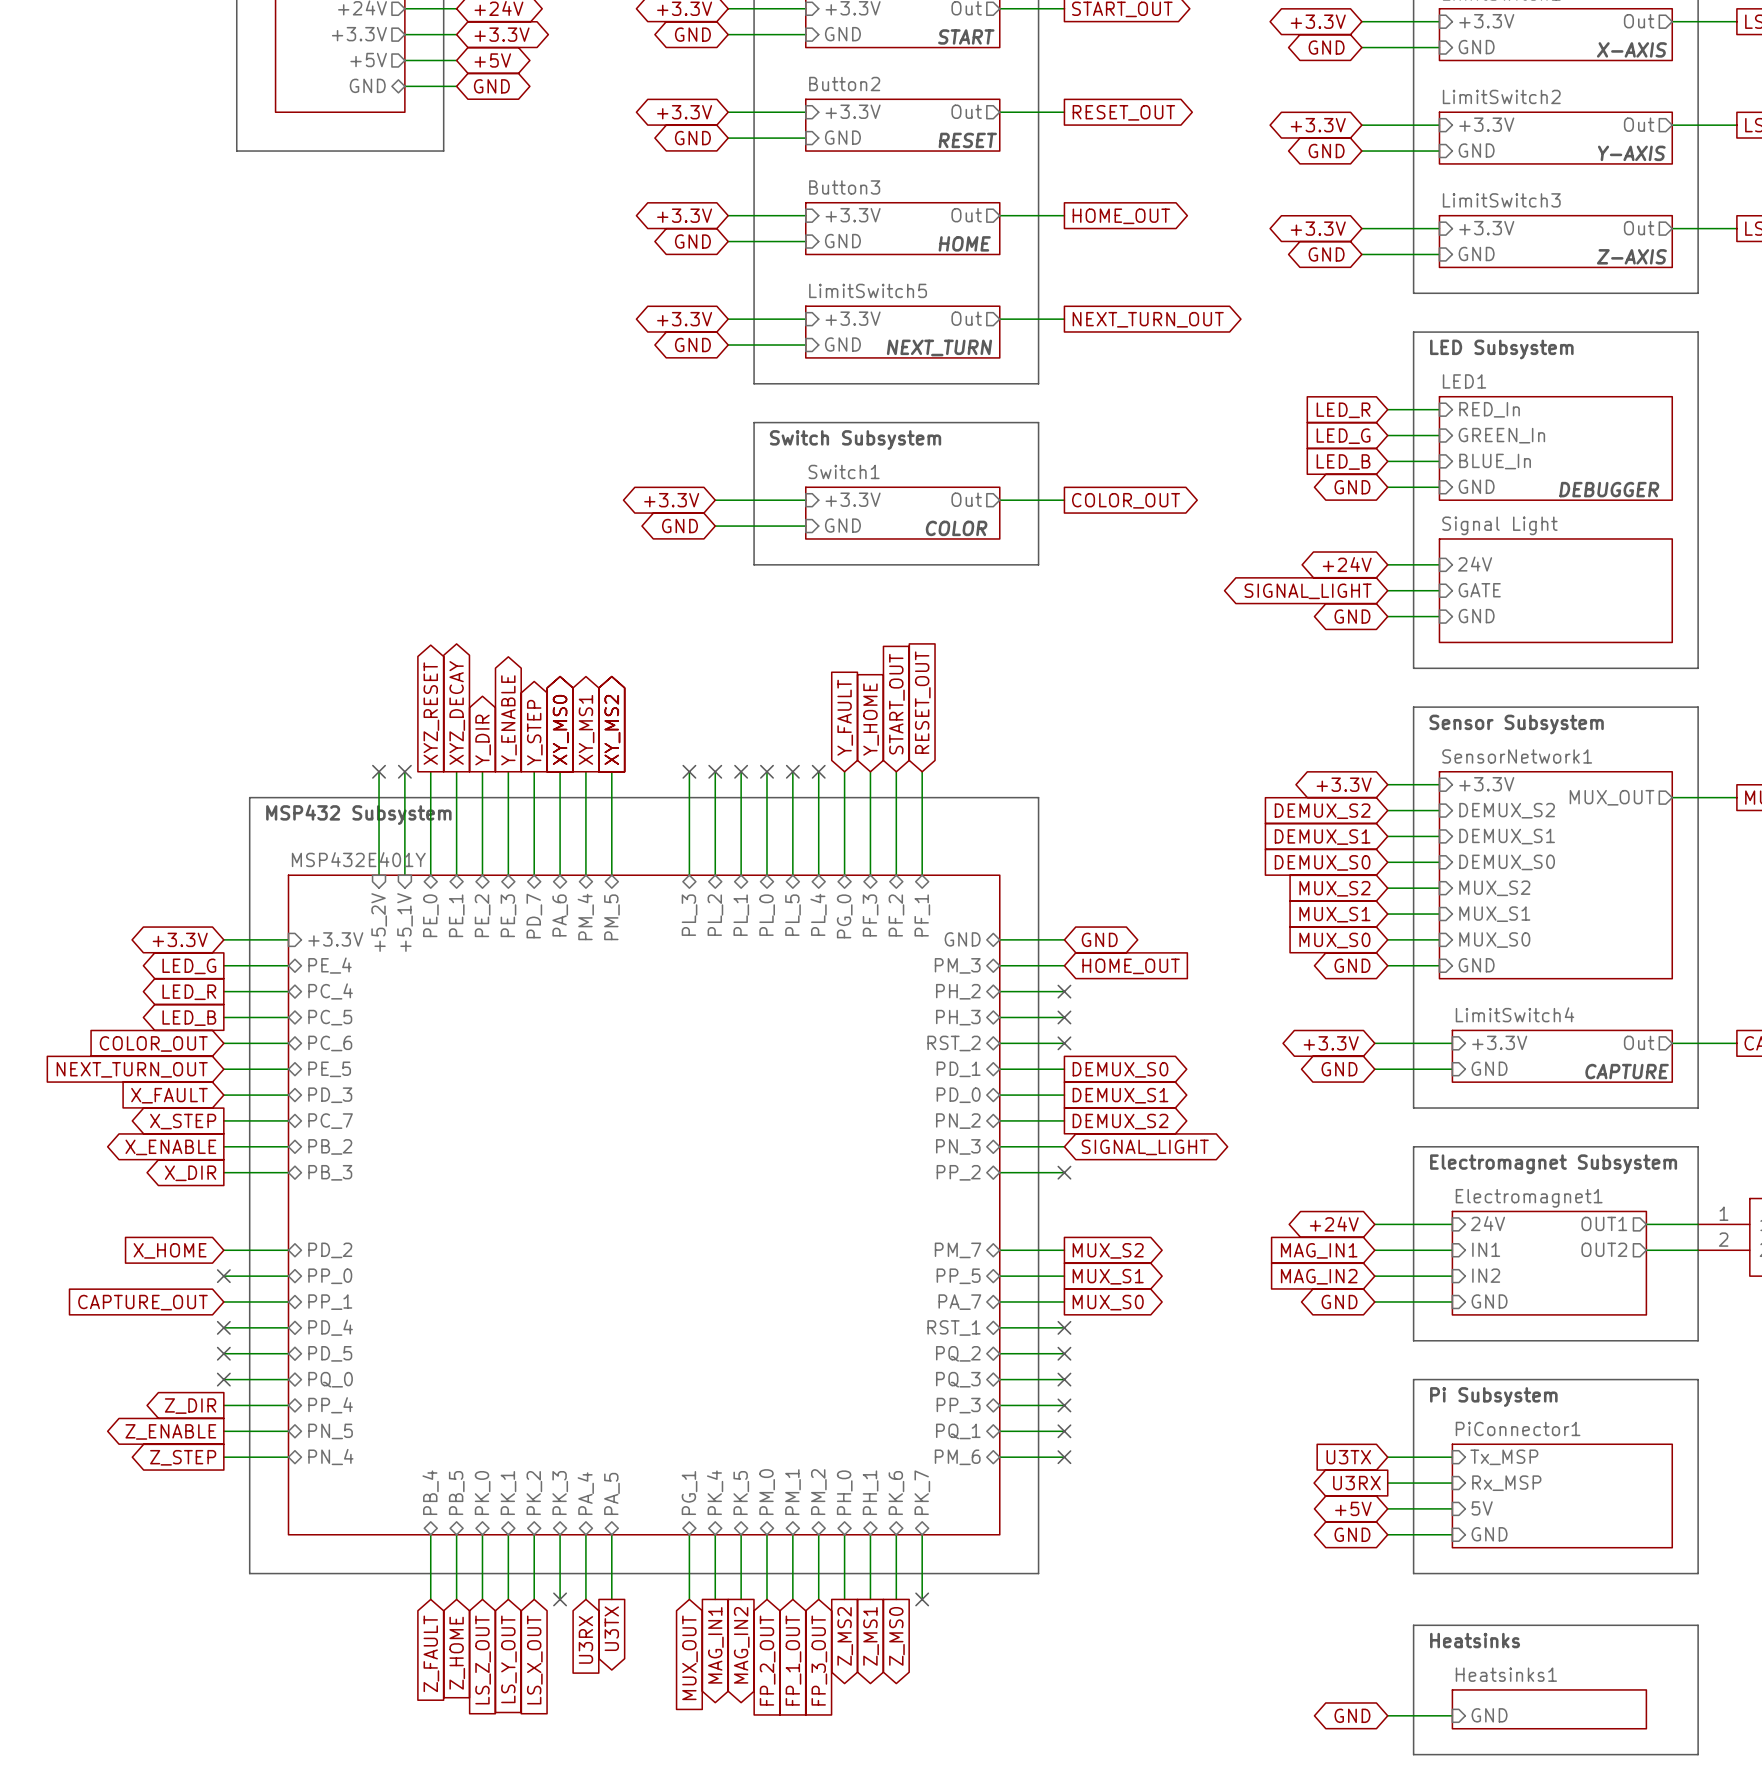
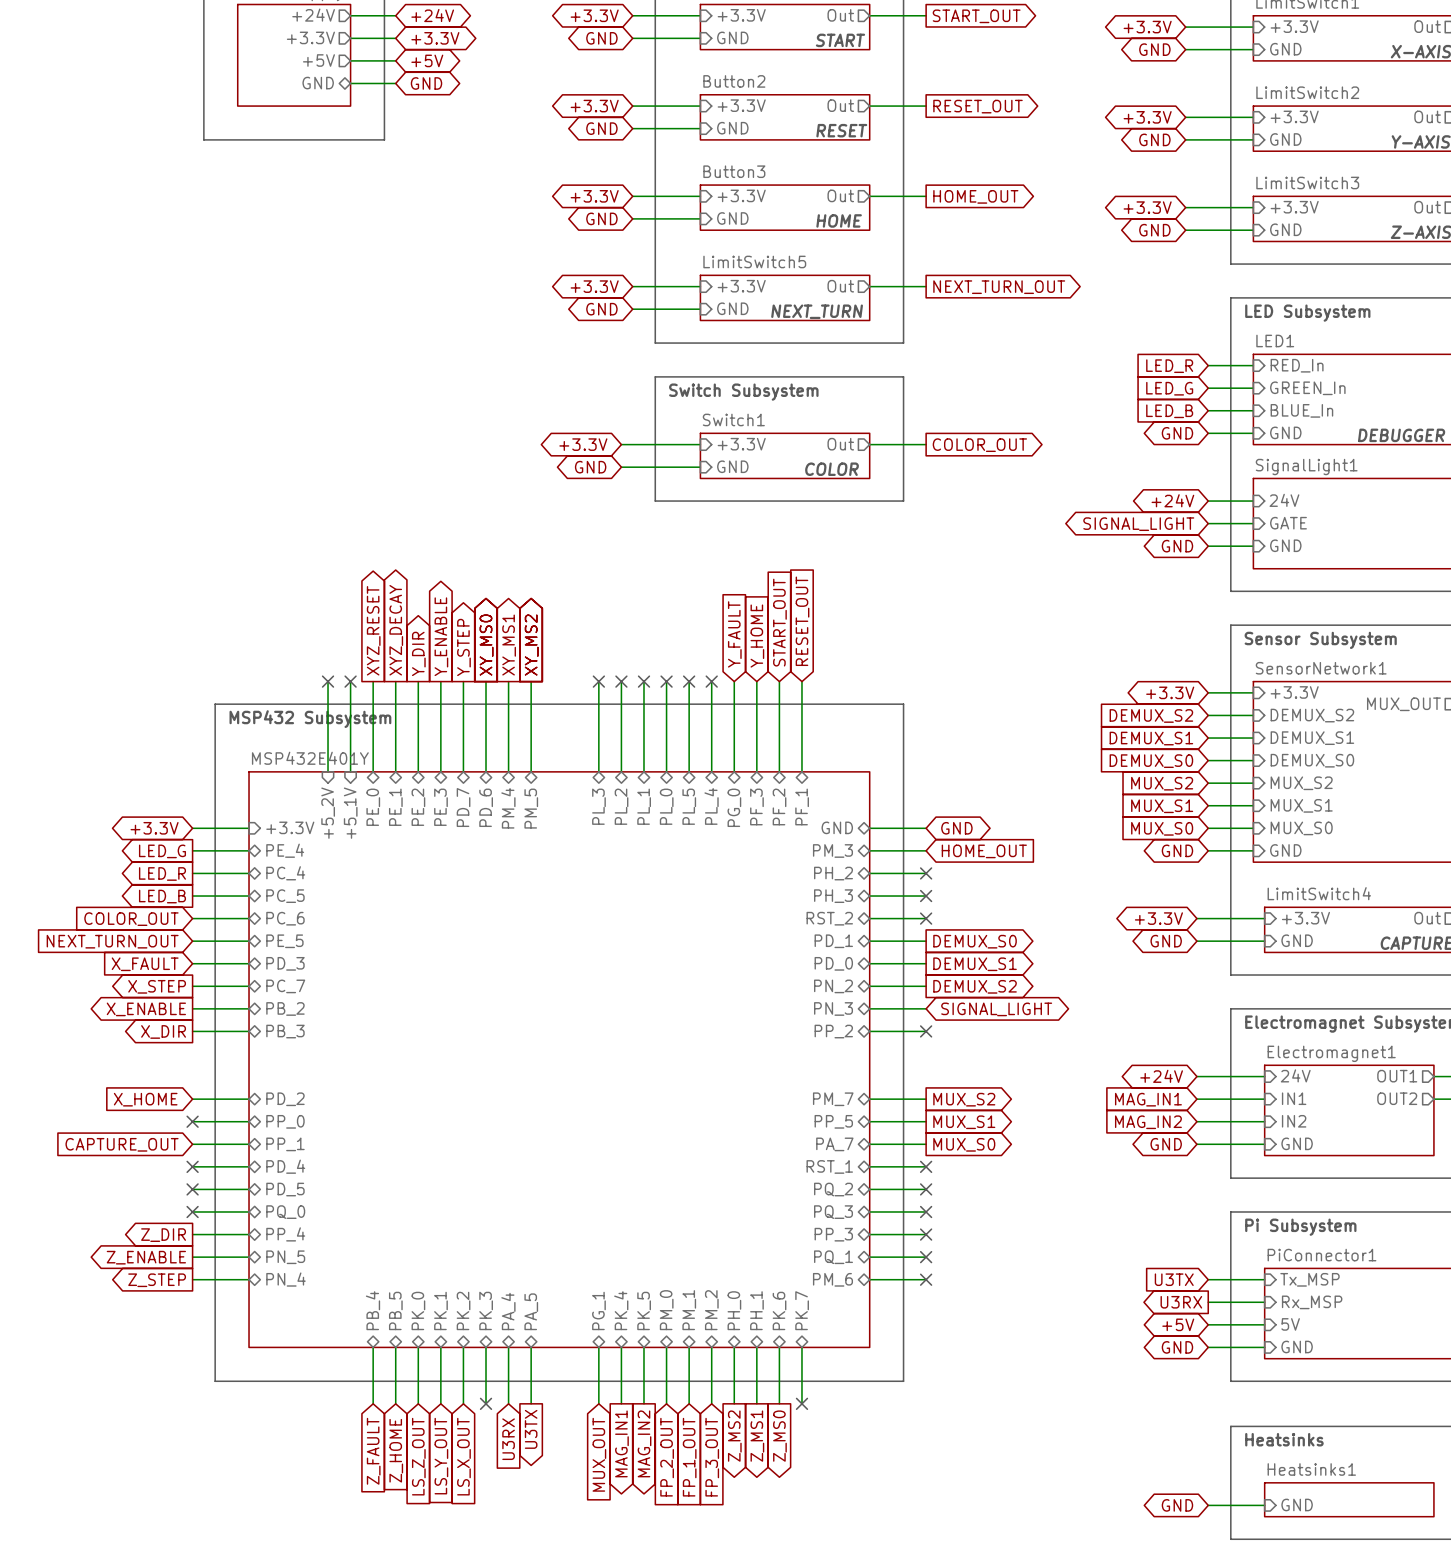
sheet Signal Light name: Signal Light (1499, 525) -> SignalLight1 (1306, 467)
sheet pin: PA_6 (560, 915) -> PD_6 (486, 807)

